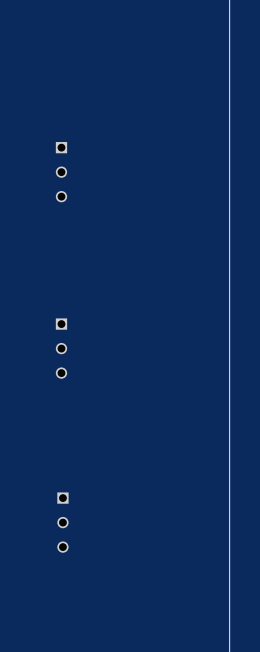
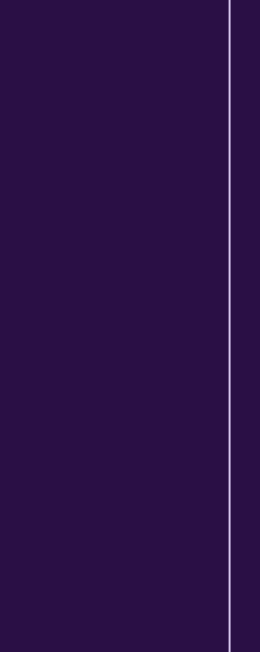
part: (61, 172) -> none
part: (61, 348) -> none
part: (62, 522) -> none

